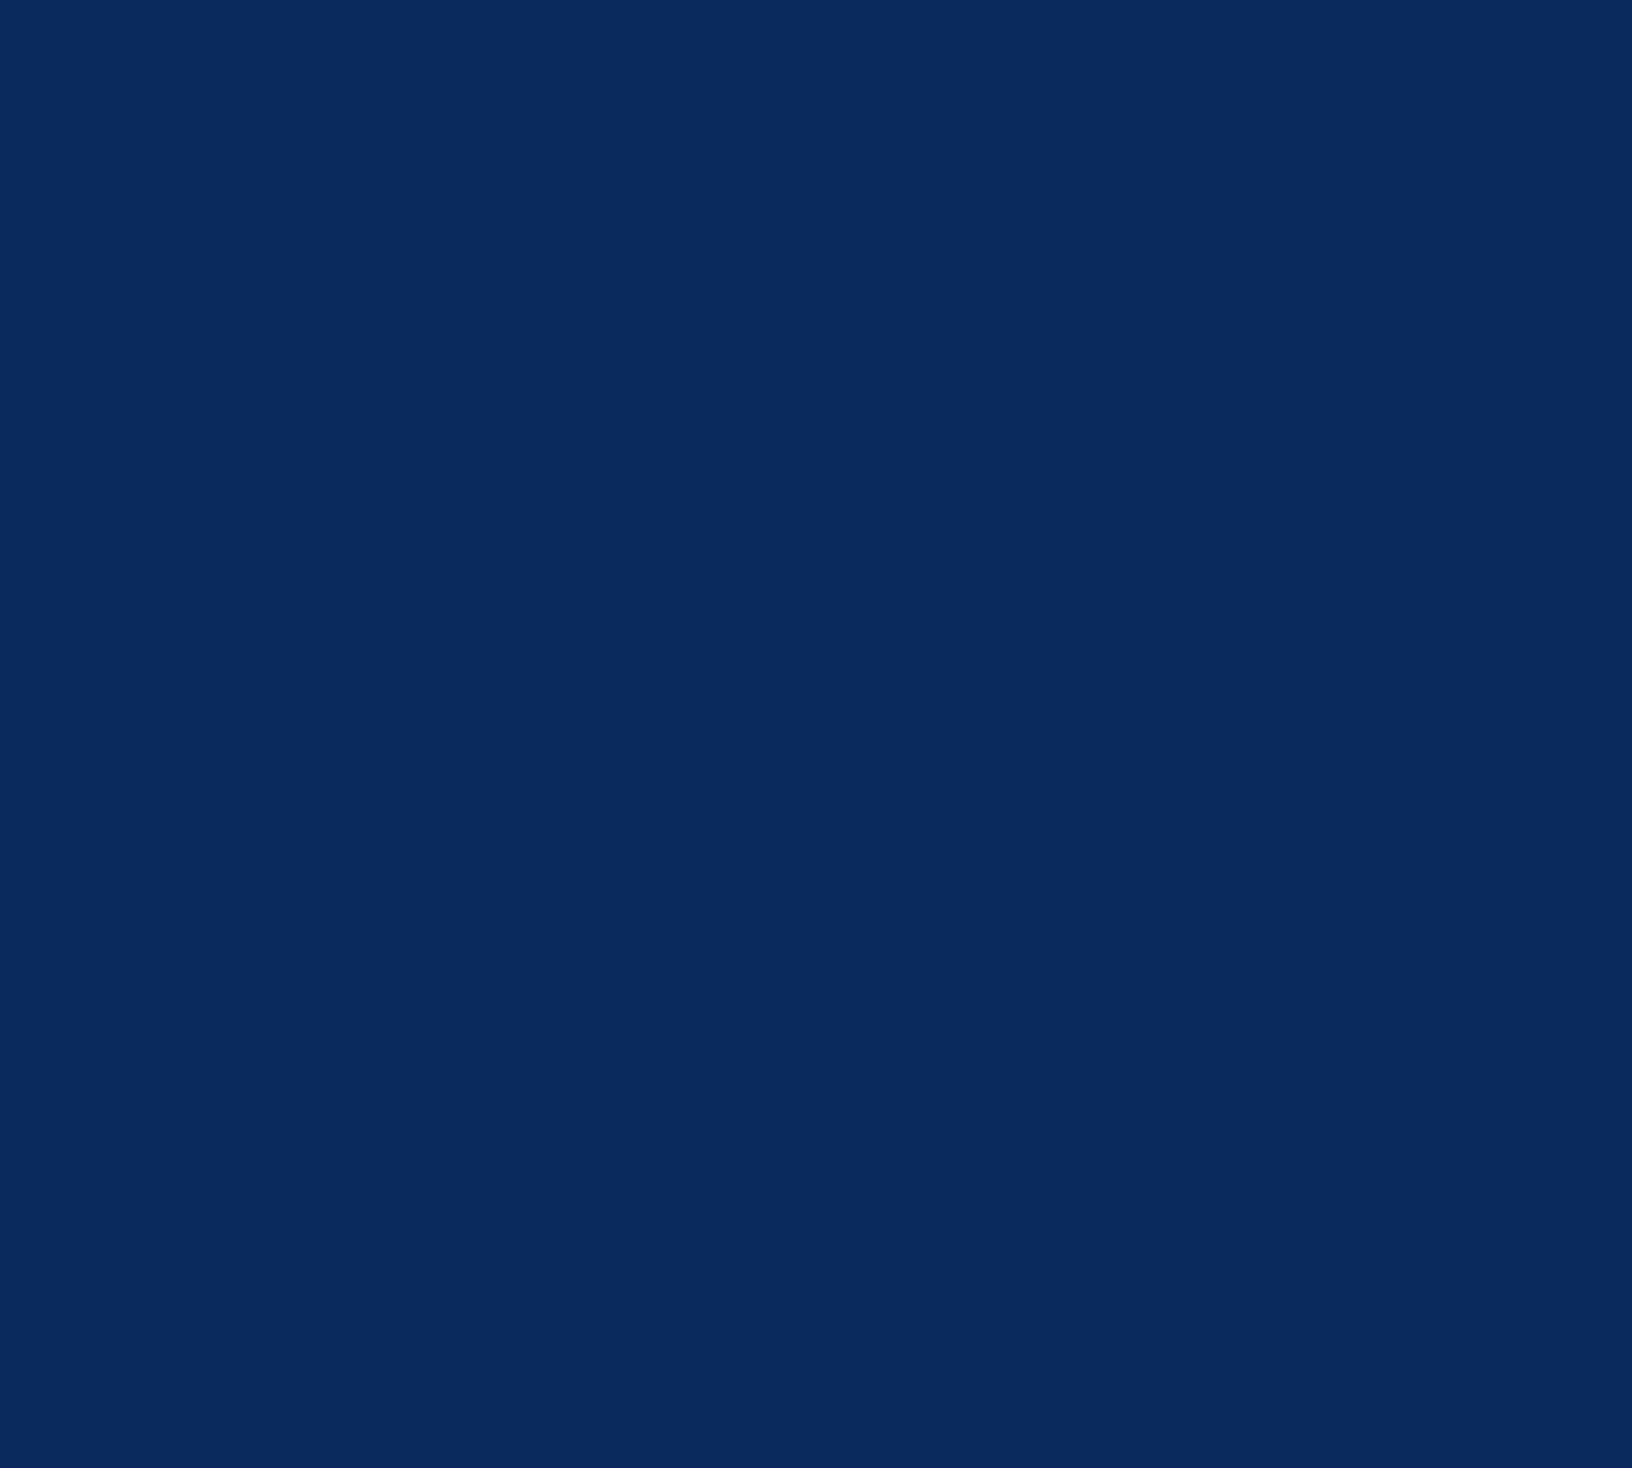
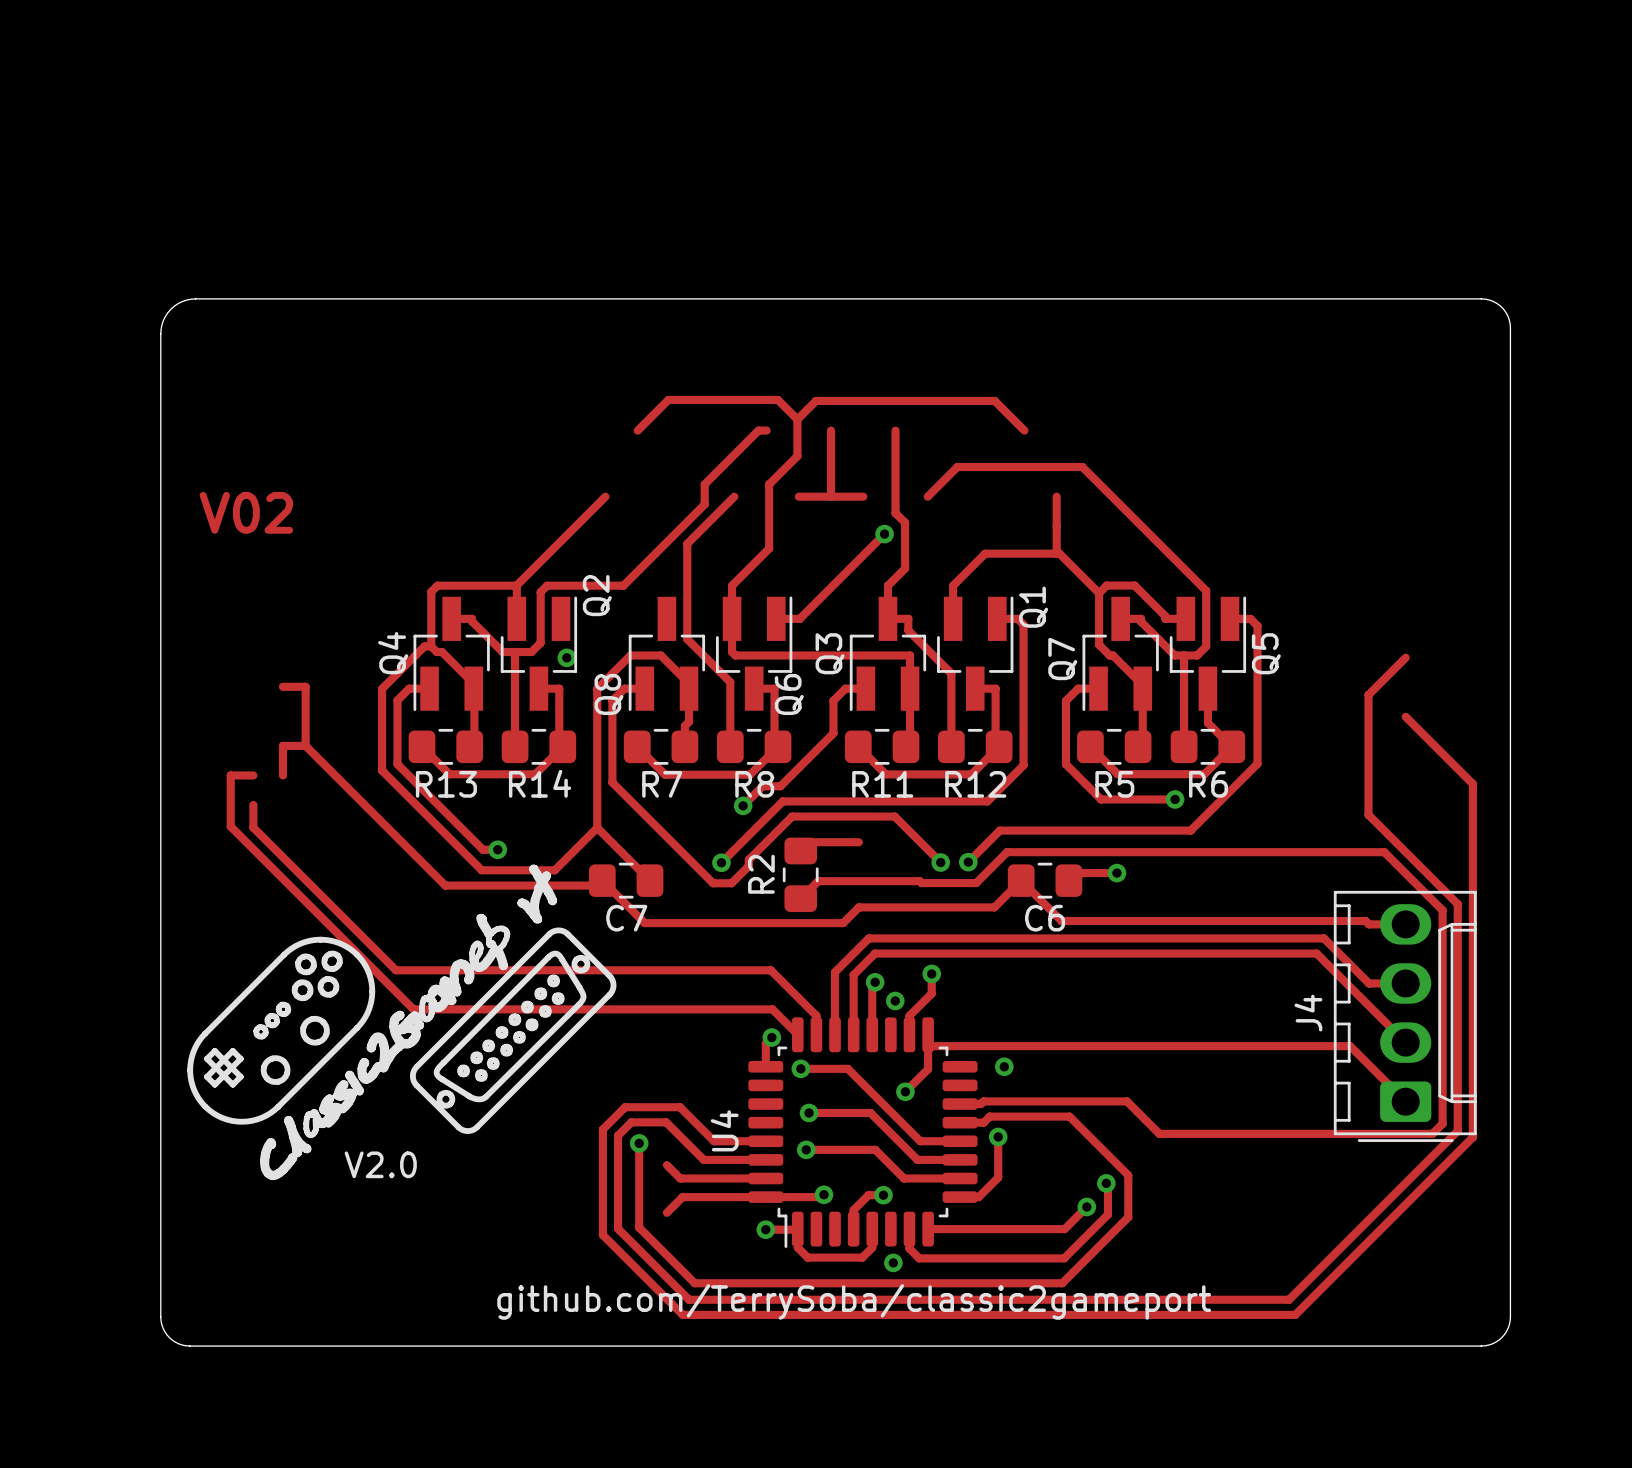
board edge: none -> (195, 298) (1481, 298) (1499, 304) (1508, 316) (1510, 327) (1510, 1316) (1504, 1334) (1495, 1342) (1481, 1346) (189, 1346) (172, 1340) (164, 1331) (160, 1316) (160, 333) (163, 320) (171, 309) (182, 301) (195, 298)
track: none -> (797, 419) (797, 456) (769, 484) (769, 548) (732, 585) (732, 652) (735, 655) (910, 655) (910, 742) (906, 746)
track: none -> (797, 419) (777, 399) (668, 399) (637, 430)
track: none -> (797, 419) (816, 400) (994, 400) (1024, 430)
track: none -> (766, 430) (758, 430) (704, 484) (704, 504) (623, 585) (547, 585) (540, 592) (540, 642) (531, 652) (502, 652) (472, 621) (472, 618) (451, 618)
track: none -> (831, 430) (831, 496)
track: none -> (895, 430) (895, 513) (905, 522) (905, 568) (887, 585) (887, 618) (908, 618) (908, 630) (951, 673) (951, 746)
track: none -> (605, 496) (516, 585) (516, 618)
track: none -> (734, 496) (687, 543) (687, 639) (730, 682) (730, 746)
track: none -> (798, 496) (863, 496)
track: none -> (927, 496) (957, 467) (1082, 467) (1206, 590) (1206, 646) (1197, 655) (1174, 655) (1141, 621) (1141, 618) (1120, 618)
track: none -> (1056, 496) (1056, 553)
text: none -> V02 (246, 512)
track: none -> (884, 534) (799, 618) (776, 618)
via: none -> (884, 534)
track: none -> (516, 585) (437, 585) (431, 591) (431, 646)
track: none -> (1099, 593) (1106, 585) (1134, 585) (1165, 616) (1165, 618) (1185, 618)
track: none -> (1099, 593) (1099, 644) (1109, 655) (1112, 655) (1142, 685) (1142, 742) (1138, 746)
track: none -> (1099, 593) (1059, 553) (985, 553) (953, 585) (953, 618)
track: none -> (997, 618) (1017, 618) (1023, 624) (1023, 765) (987, 801) (782, 801) (721, 862)
track: none -> (1230, 618) (1250, 618) (1257, 625) (1257, 763) (1190, 830) (999, 830) (968, 862)
track: none -> (431, 646) (436, 652) (442, 652) (474, 684) (474, 742) (469, 746)
track: none -> (431, 646) (424, 646) (382, 688) (382, 770) (481, 870) (554, 870) (597, 827)
track: none -> (515, 652) (515, 746)
Q4: none -> (451, 653)
Q2: none -> (538, 653)
Q8: none -> (666, 653)
Q6: none -> (754, 653)
Q3: none -> (887, 653)
Q1: none -> (975, 653)
Q7: none -> (1120, 653)
Q5: none -> (1207, 653)
track: none -> (1184, 655) (1184, 746)
via: none -> (566, 657)
track: none -> (1405, 657) (1368, 694) (1368, 814) (1457, 904) (1457, 1131) (1289, 1299) (689, 1299) (618, 1228) (618, 1135) (631, 1122) (666, 1122) (703, 1159) (765, 1159)
track: none -> (282, 686) (305, 686) (305, 745)
track: none -> (429, 688) (409, 688) (397, 700) (397, 764) (482, 849) (497, 849)
track: none -> (538, 688) (559, 688) (559, 743) (562, 746) (535, 774) (449, 774) (421, 746)
track: none -> (644, 688) (624, 688) (612, 700) (612, 782) (713, 883) (731, 883) (748, 866) (748, 859) (792, 816) (894, 816) (940, 862)
track: none -> (754, 688) (774, 688) (774, 743) (778, 746) (750, 774) (665, 774) (637, 746)
track: none -> (865, 688) (845, 688) (833, 700) (833, 733) (780, 786) (762, 786) (743, 805)
track: none -> (975, 688) (995, 688) (995, 743) (999, 746) (971, 774) (885, 774) (858, 746)
track: none -> (1098, 688) (1078, 688) (1065, 700) (1065, 764) (1101, 799) (1175, 799)
track: none -> (1207, 688) (1207, 722) (1231, 746) (1204, 774) (1117, 774) (1090, 746)
track: none -> (1405, 716) (1472, 784) (1472, 1137) (1295, 1314) (682, 1314) (602, 1235) (602, 1129) (625, 1107) (680, 1107) (714, 1141) (765, 1141)
track: none -> (305, 745) (445, 885) (597, 885) (602, 880) (644, 923) (843, 923) (858, 907) (994, 907) (1021, 880) (1061, 921) (1365, 921) (1369, 924) (1405, 924)
track: none -> (305, 745) (282, 745) (282, 775)
R13: none -> (445, 746)
R14: none -> (538, 746)
R7: none -> (661, 746)
track: none -> (684, 746) (684, 725) (689, 721) (689, 683) (660, 655) (630, 655) (597, 688) (597, 827)
R8: none -> (754, 746)
R11: none -> (882, 746)
R12: none -> (975, 746)
R5: none -> (1114, 746)
R6: none -> (1207, 746)
track: none -> (253, 775) (230, 775) (230, 826) (413, 1009) (772, 1009) (797, 1034)
via: none -> (1175, 799)
track: none -> (253, 805) (253, 827) (395, 970) (770, 970) (816, 1015) (816, 1034)
via: none -> (743, 805)
track: none -> (597, 827) (650, 880)
track: none -> (858, 842) (809, 842) (800, 850)
via: none -> (497, 849)
via: none -> (721, 862)
via: none -> (940, 862)
via: none -> (968, 862)
line: none -> (534, 868) (532, 869) (540, 882) (537, 888) (539, 889) (542, 885) (551, 901) (553, 902) (552, 895) (544, 882) (547, 875) (545, 874) (542, 879) (535, 868)
track: none -> (1116, 873) (1076, 873) (1068, 880)
via: none -> (1116, 873)
R2: none -> (800, 874)
C7: none -> (626, 880)
C6: none -> (1045, 880)
track: none -> (800, 898) (818, 881) (976, 883) (1007, 852) (1384, 852) (1442, 910) (1442, 1123) (1432, 1133) (1159, 1133) (1127, 1101) (983, 1101) (980, 1104) (960, 1104)
line: none -> (481, 916) (491, 933) (499, 928) (506, 931) (506, 939) (499, 948) (504, 967) (501, 966) (492, 943) (491, 945) (489, 944) (489, 937) (479, 920) (481, 916)
line: none -> (538, 920) (536, 920) (520, 903) (521, 901) (525, 902) (533, 911) (533, 900) (539, 887) (540, 889) (536, 906) (538, 920)
line: none -> (549, 934) (413, 1071) (413, 1078) (415, 1084) (462, 1130) (470, 1130) (477, 1127) (612, 990) (613, 982) (610, 976) (566, 933) (557, 930) (549, 934)
line: none -> (320, 939) (333, 941) (347, 947) (357, 954) (364, 964) (370, 978) (372, 991) (370, 1003) (364, 1017) (357, 1027) (270, 1113) (256, 1119) (241, 1121) (227, 1119) (213, 1113) (200, 1100) (191, 1082) (190, 1062) (197, 1043) (287, 951) (303, 942) (320, 939)
line: none -> (477, 943) (473, 948) (472, 958) (474, 966) (479, 969) (487, 963) (494, 952) (492, 951) (483, 962) (478, 965) (475, 959) (480, 948) (477, 943)
line: none -> (330, 953) (325, 957) (324, 963) (327, 967) (332, 968) (338, 965) (339, 959) (336, 954) (330, 953)
line: none -> (303, 956) (309, 957) (313, 962) (312, 968) (308, 972) (302, 971) (298, 966) (299, 960) (303, 956)
line: none -> (548, 957) (440, 1066) (436, 1072) (439, 1077) (472, 1097) (484, 1098) (580, 1002) (583, 998) (582, 993) (560, 956) (554, 953) (548, 957)
line: none -> (576, 959) (580, 957) (585, 959) (587, 964) (585, 968) (580, 970) (576, 968) (574, 964) (576, 959)
line: none -> (460, 962) (468, 966) (471, 977) (469, 981) (467, 980) (466, 970) (460, 965) (455, 975) (458, 992) (455, 993) (445, 983) (452, 1001) (437, 991) (431, 994) (432, 989) (435, 987) (445, 993) (442, 985) (444, 979) (453, 986) (453, 968) (455, 964) (460, 962)
track: none -> (931, 973) (931, 993) (909, 1015) (909, 1034)
via: none -> (931, 973)
line: none -> (551, 978) (556, 978) (556, 983) (551, 983) (551, 978)
line: none -> (326, 979) (332, 979) (336, 984) (335, 990) (330, 994) (324, 993) (320, 988) (321, 982) (326, 979)
line: none -> (300, 982) (295, 986) (294, 992) (298, 997) (304, 997) (309, 994) (310, 988) (306, 983) (300, 982)
track: none -> (875, 982) (872, 985) (872, 1034)
via: none -> (875, 982)
track: none -> (1405, 983) (1369, 983) (1324, 938) (868, 938) (835, 972) (835, 1034)
line: none -> (538, 991) (543, 991) (543, 996) (538, 996) (538, 991)
line: none -> (430, 996) (437, 1005) (445, 998) (447, 1000) (438, 1009) (435, 1008) (431, 1004) (431, 1014) (426, 1019) (422, 1014) (422, 1003) (424, 998) (427, 999) (430, 996)
line: none -> (555, 996) (555, 1001) (560, 1001) (560, 996) (555, 996)
via: none -> (895, 1000)
line: none -> (282, 1004) (278, 1010) (284, 1013) (288, 1008) (282, 1004)
line: none -> (524, 1004) (524, 1009) (529, 1009) (529, 1004) (524, 1004)
line: none -> (542, 1008) (542, 1013) (547, 1013) (547, 1008) (542, 1008)
line: none -> (400, 1013) (401, 1015) (396, 1020) (395, 1027) (398, 1035) (403, 1041) (409, 1041) (414, 1035) (412, 1030) (401, 1031) (399, 1029) (411, 1016) (416, 1014) (421, 1024) (418, 1026) (414, 1018) (406, 1026) (414, 1028) (417, 1033) (415, 1040) (408, 1045) (399, 1042) (393, 1031) (393, 1019) (400, 1013)
line: none -> (270, 1016) (267, 1021) (273, 1025) (276, 1019) (270, 1016)
J4: none -> (1405, 1016)
line: none -> (512, 1017) (512, 1022) (517, 1022) (517, 1017) (512, 1017)
line: none -> (311, 1019) (304, 1024) (303, 1033) (309, 1041) (318, 1042) (325, 1036) (326, 1027) (320, 1020) (311, 1019)
line: none -> (529, 1022) (534, 1022) (534, 1027) (529, 1027) (529, 1022)
line: none -> (259, 1027) (265, 1030) (262, 1036) (256, 1033) (259, 1027)
line: none -> (499, 1030) (499, 1035) (504, 1035) (504, 1030) (499, 1030)
line: none -> (516, 1034) (516, 1039) (521, 1039) (521, 1034) (516, 1034)
track: none -> (853, 1034) (853, 974) (875, 953) (1316, 953) (1405, 1042)
track: none -> (928, 1034) (928, 1069) (905, 1091)
track: none -> (771, 1037) (765, 1043) (765, 1066)
via: none -> (771, 1037)
line: none -> (486, 1043) (491, 1043) (491, 1048) (486, 1048) (486, 1043)
track: none -> (928, 1046) (1350, 1046) (1405, 1101)
line: none -> (504, 1047) (509, 1047) (509, 1052) (504, 1052) (504, 1047)
line: none -> (214, 1050) (207, 1058) (232, 1084) (240, 1076) (214, 1050)
line: none -> (232, 1050) (207, 1076) (214, 1084) (240, 1058) (232, 1050)
line: none -> (474, 1055) (479, 1055) (479, 1060) (474, 1060) (474, 1055)
line: none -> (272, 1058) (265, 1064) (264, 1073) (269, 1080) (278, 1081) (285, 1076) (287, 1067) (281, 1059) (272, 1058)
line: none -> (364, 1060) (366, 1063) (363, 1071) (365, 1077) (370, 1074) (377, 1065) (379, 1066) (373, 1076) (366, 1080) (362, 1079) (360, 1072) (361, 1064) (364, 1060)
line: none -> (385, 1060) (398, 1044) (401, 1044) (382, 1069) (382, 1049) (379, 1039) (375, 1040) (372, 1049) (369, 1048) (372, 1039) (376, 1035) (381, 1036) (384, 1041) (385, 1059)
line: none -> (490, 1061) (495, 1061) (495, 1066) (490, 1066) (490, 1061)
via: none -> (1004, 1066)
line: none -> (461, 1068) (466, 1068) (466, 1073) (461, 1073) (461, 1068)
track: none -> (800, 1068) (847, 1068) (920, 1141) (960, 1141)
via: none -> (800, 1068)
line: none -> (478, 1072) (478, 1077) (483, 1077) (483, 1072) (478, 1072)
line: none -> (348, 1073) (358, 1086) (360, 1092) (349, 1078) (348, 1073)
line: none -> (343, 1083) (345, 1085) (339, 1094) (349, 1091) (354, 1093) (349, 1104) (342, 1110) (341, 1107) (350, 1094) (340, 1097) (336, 1096) (338, 1087) (343, 1083)
via: none -> (905, 1091)
line: none -> (441, 1094) (439, 1099) (441, 1103) (445, 1105) (450, 1103) (452, 1099) (450, 1094) (445, 1092) (441, 1094)
line: none -> (329, 1097) (324, 1102) (322, 1110) (326, 1112) (336, 1108) (326, 1122) (328, 1124) (335, 1118) (339, 1108) (335, 1105) (325, 1108) (331, 1099) (329, 1097)
line: none -> (314, 1112) (321, 1121) (329, 1114) (331, 1116) (323, 1125) (319, 1124) (315, 1119) (315, 1130) (310, 1135) (306, 1129) (306, 1118) (308, 1114) (312, 1115) (314, 1112)
track: none -> (809, 1112) (870, 1112) (917, 1159) (960, 1159)
via: none -> (809, 1112)
line: none -> (289, 1119) (287, 1121) (295, 1153) (297, 1154) (299, 1151) (296, 1142) (305, 1149) (308, 1148) (297, 1138) (289, 1119)
track: none -> (960, 1122) (983, 1122) (989, 1116) (1069, 1116) (1128, 1175) (1128, 1217) (1062, 1283) (694, 1283) (639, 1227) (639, 1143)
U4: none -> (862, 1132)
track: none -> (998, 1136) (998, 1177) (978, 1197) (960, 1197)
via: none -> (998, 1136)
line: none -> (269, 1141) (272, 1141) (273, 1144) (268, 1149) (266, 1162) (270, 1172) (277, 1172) (291, 1156) (294, 1157) (284, 1171) (274, 1177) (266, 1174) (263, 1164) (264, 1151) (269, 1141)
via: none -> (639, 1143)
track: none -> (806, 1149) (875, 1149) (904, 1178) (960, 1178)
via: none -> (806, 1149)
text: none -> V2.0 (380, 1164)
track: none -> (666, 1165) (680, 1178) (765, 1178)
track: none -> (1106, 1183) (1107, 1184) (1107, 1214) (1064, 1258) (919, 1258) (909, 1248) (909, 1229)
via: none -> (1106, 1183)
track: none -> (823, 1194) (821, 1197) (682, 1197) (666, 1212)
via: none -> (823, 1194)
track: none -> (883, 1195) (868, 1195) (853, 1210) (853, 1229)
via: none -> (883, 1195)
track: none -> (1086, 1206) (1064, 1229) (928, 1229)
via: none -> (1086, 1206)
via: none -> (765, 1229)
track: none -> (872, 1229) (872, 1247) (862, 1257) (807, 1257) (797, 1247) (797, 1229) (765, 1229)
via: none -> (893, 1262)
text: none -> github.com/TerrySoba/classic2gameport (854, 1301)

